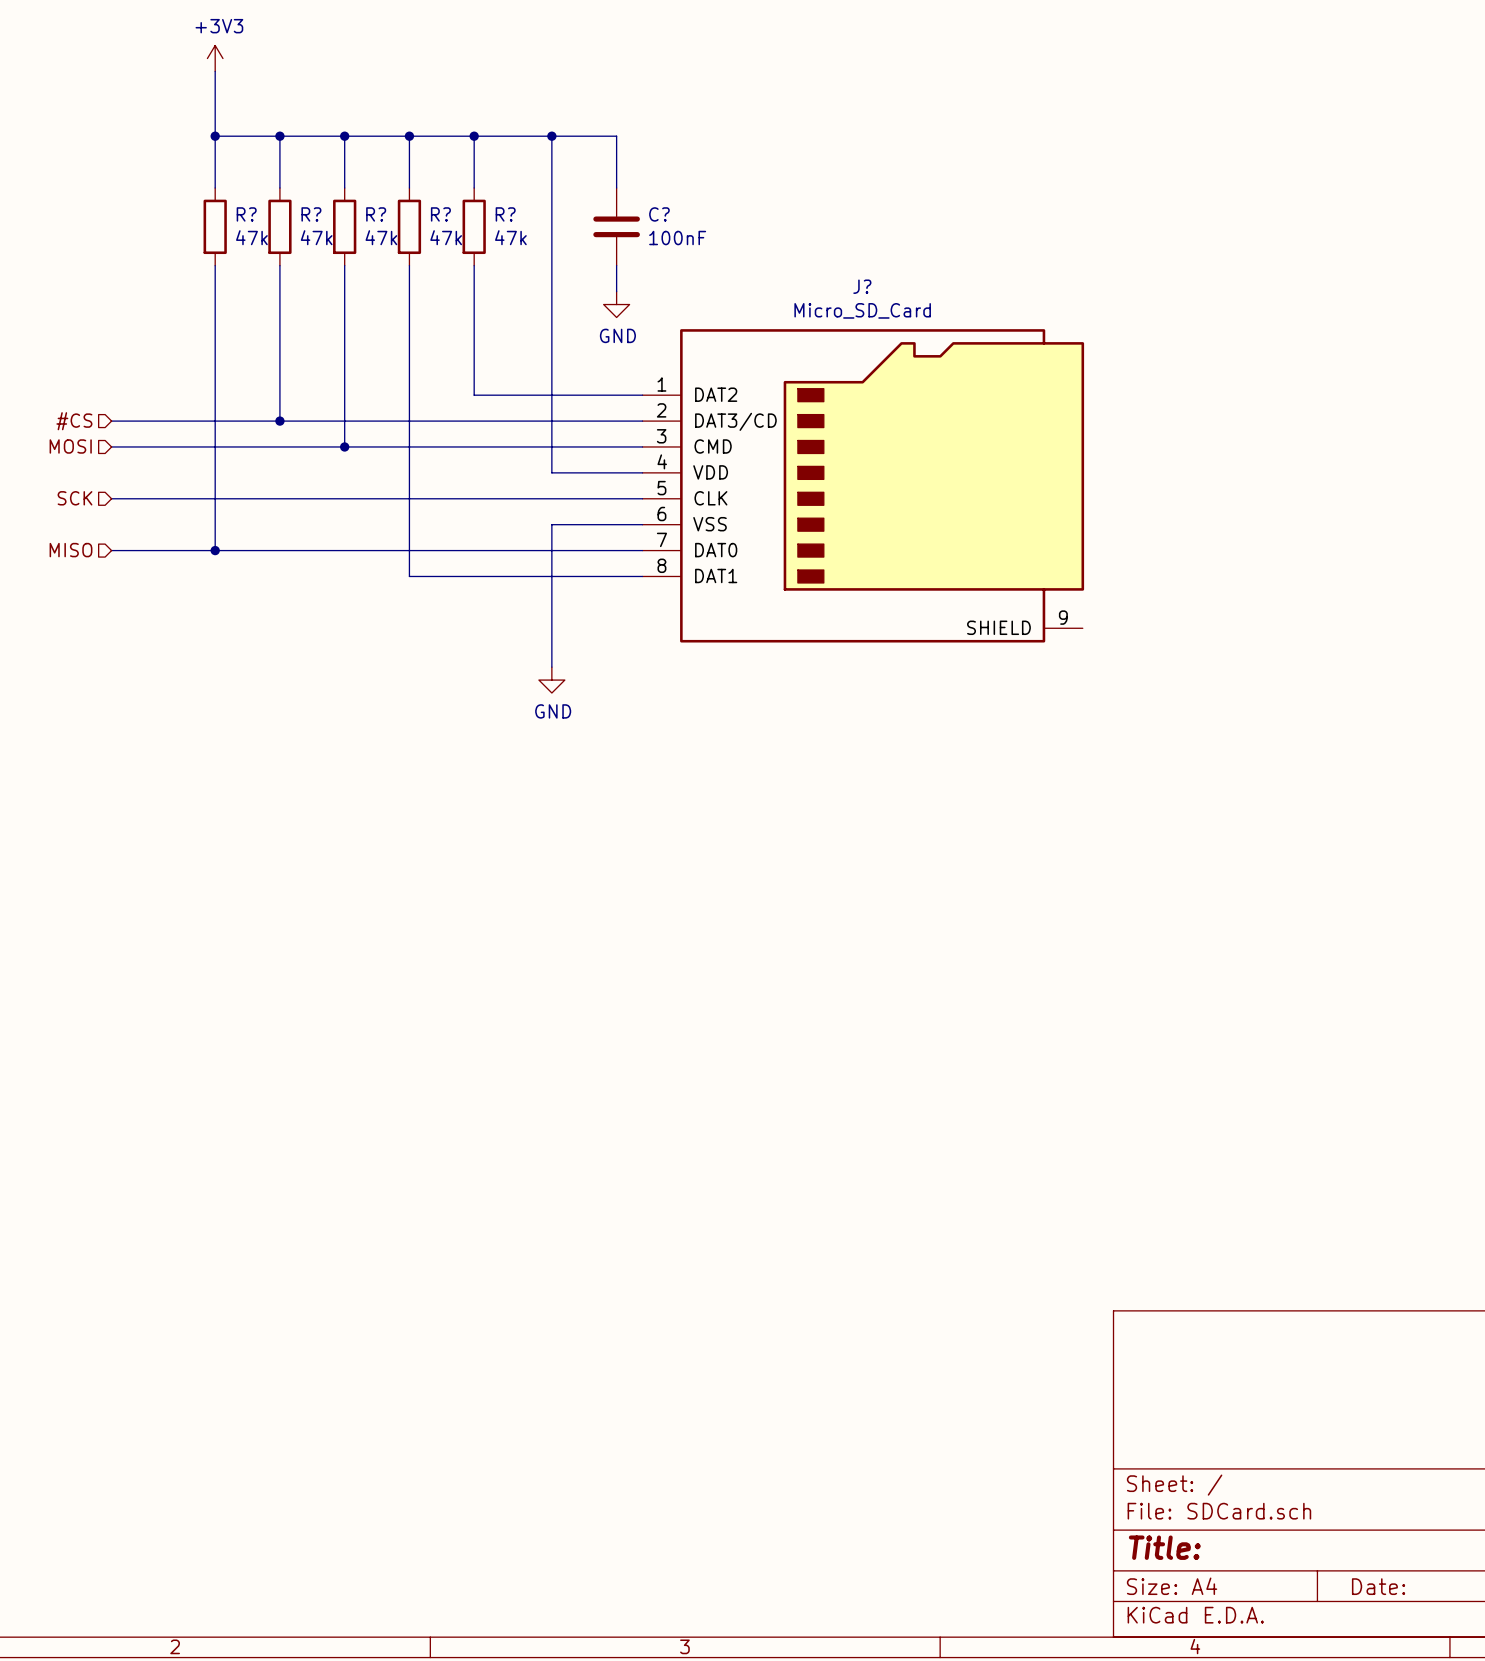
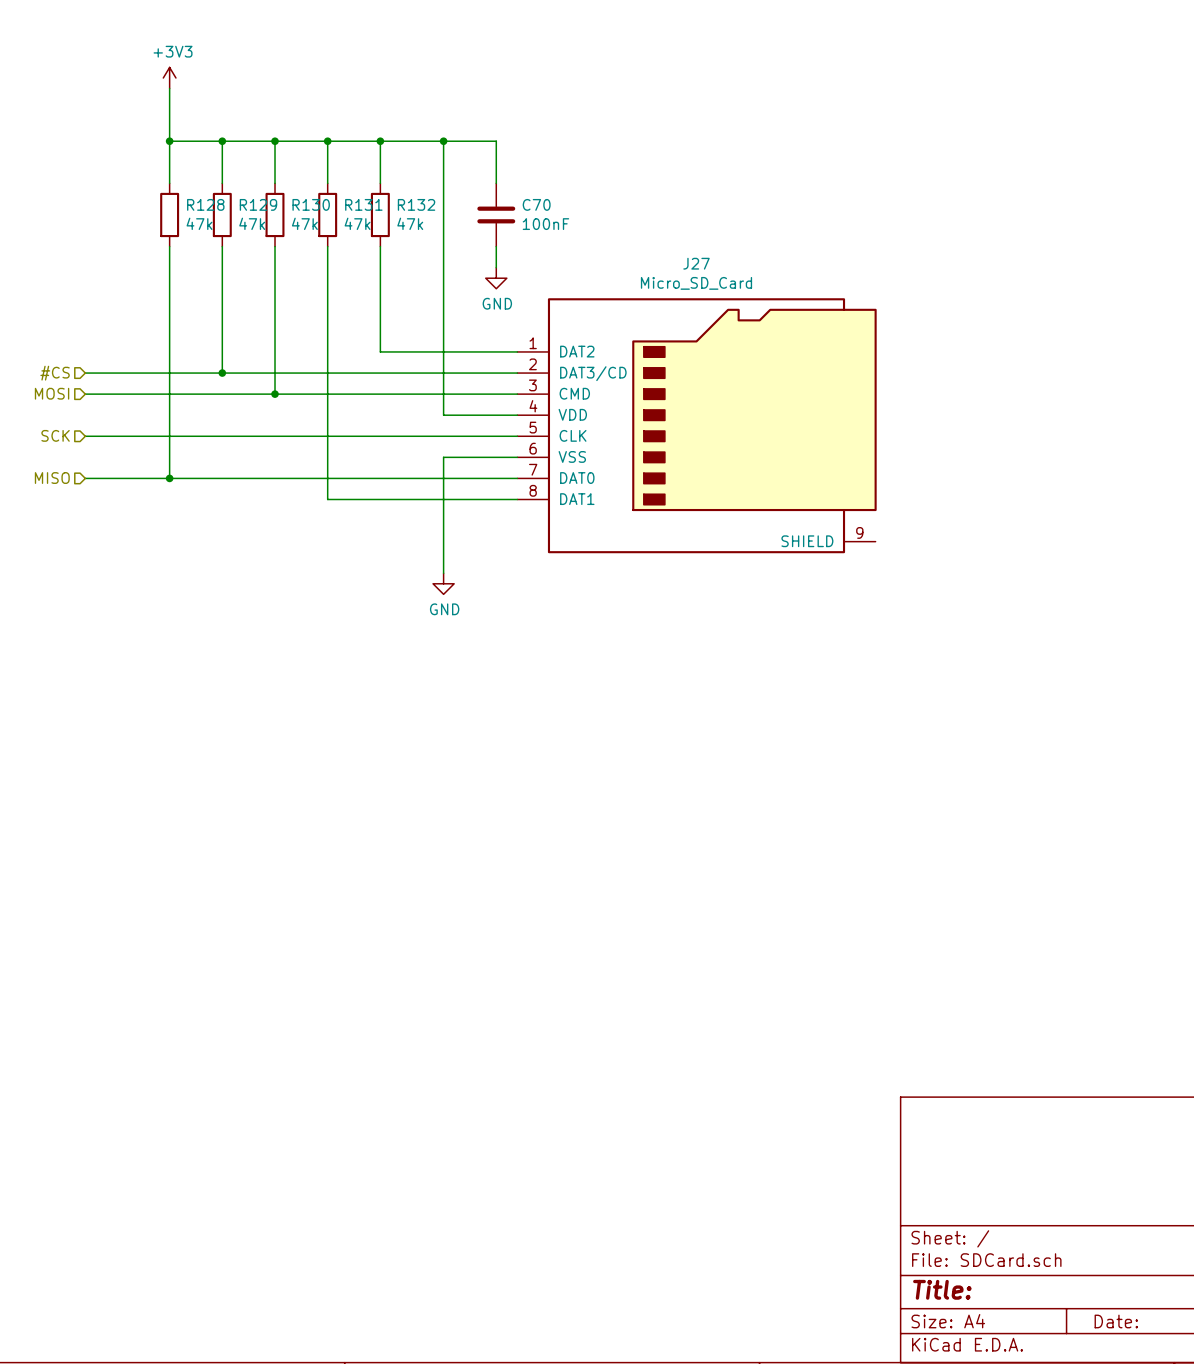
R? name: R? (246, 214) -> R128 (205, 204)
R? name: R? (311, 214) -> R129 (258, 204)
R? name: R? (376, 214) -> R130 (311, 204)
R? name: R? (440, 214) -> R131 (363, 204)
R? name: R? (505, 214) -> R132 (416, 204)
C? name: C? (659, 214) -> C70 (536, 204)
J? name: J? (862, 286) -> J27 (696, 263)

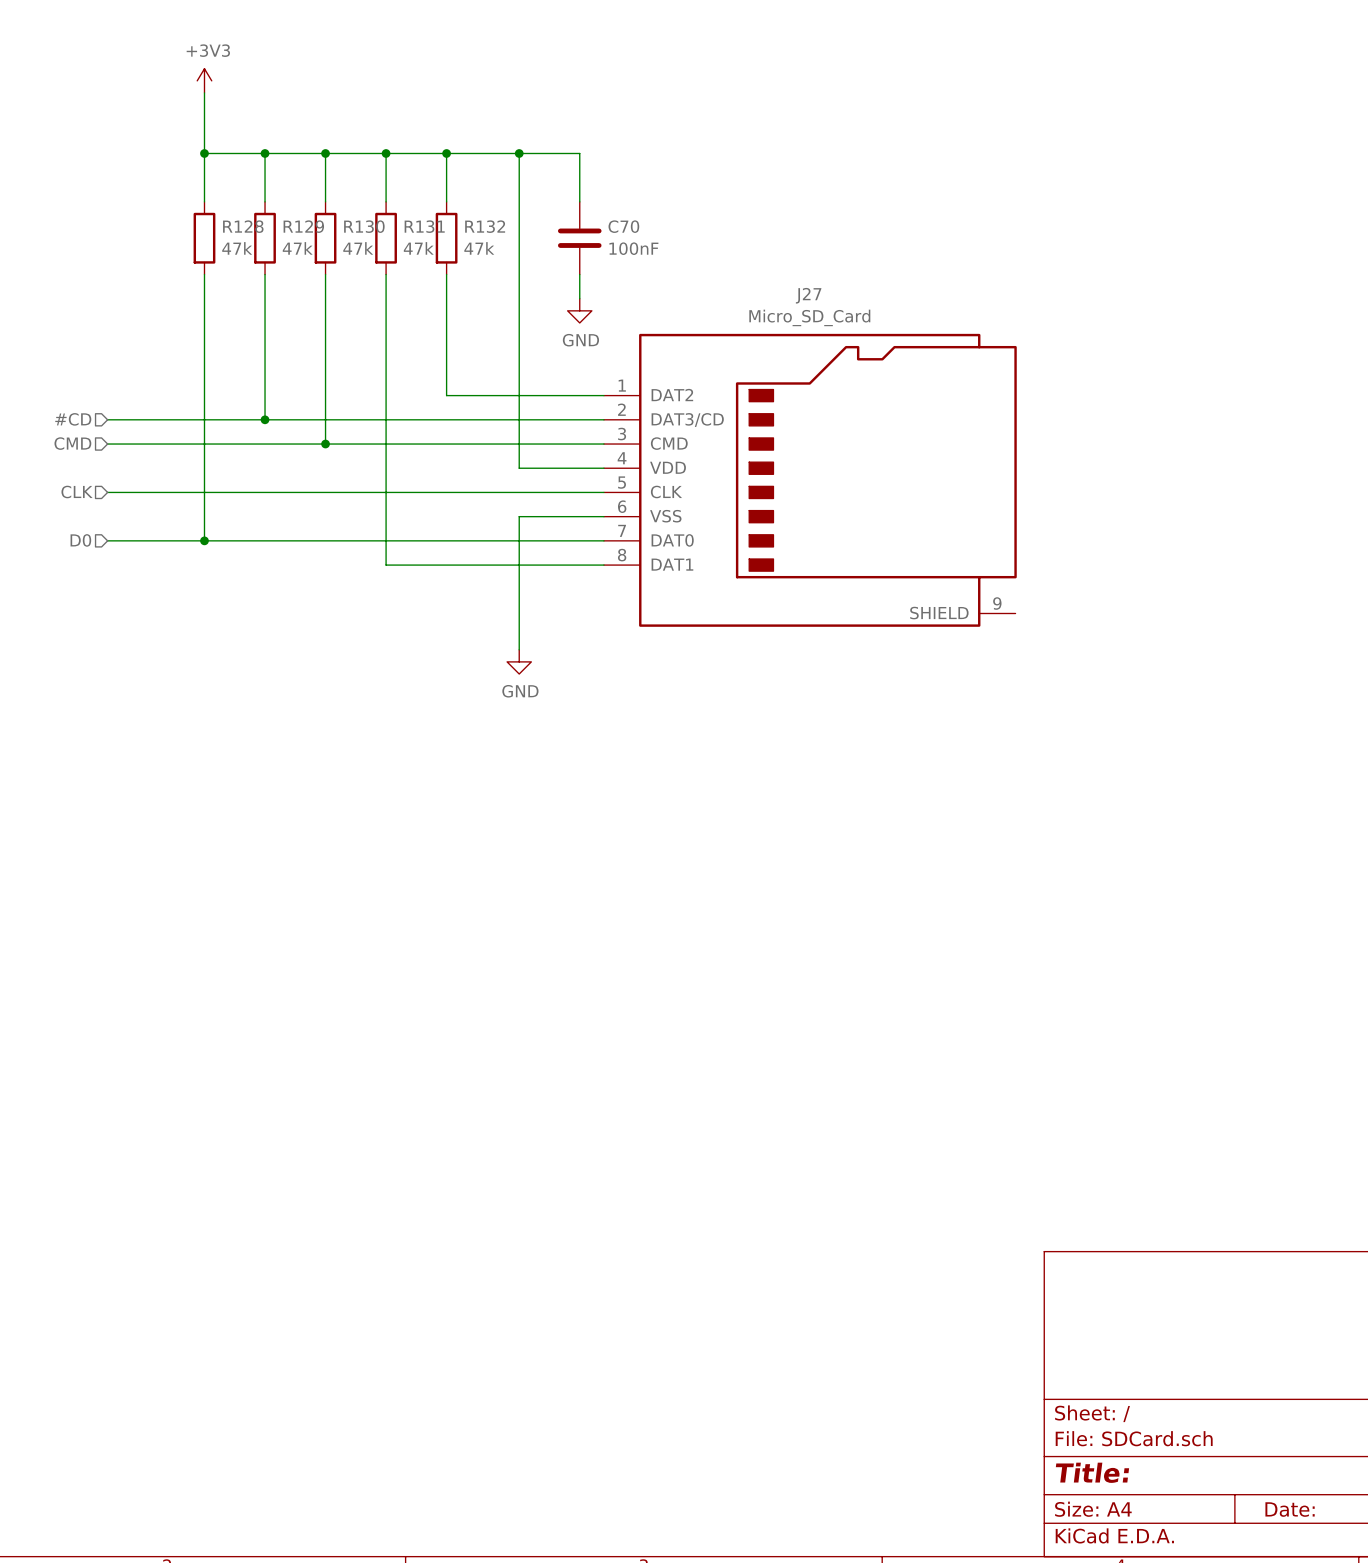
hierarchical label: #CS (55, 373) -> #CD (73, 419)
hierarchical label: MOSI (52, 393) -> CMD (72, 443)
hierarchical label: SCK (55, 435) -> CLK (77, 491)
hierarchical label: MISO (52, 478) -> D0 (80, 540)

